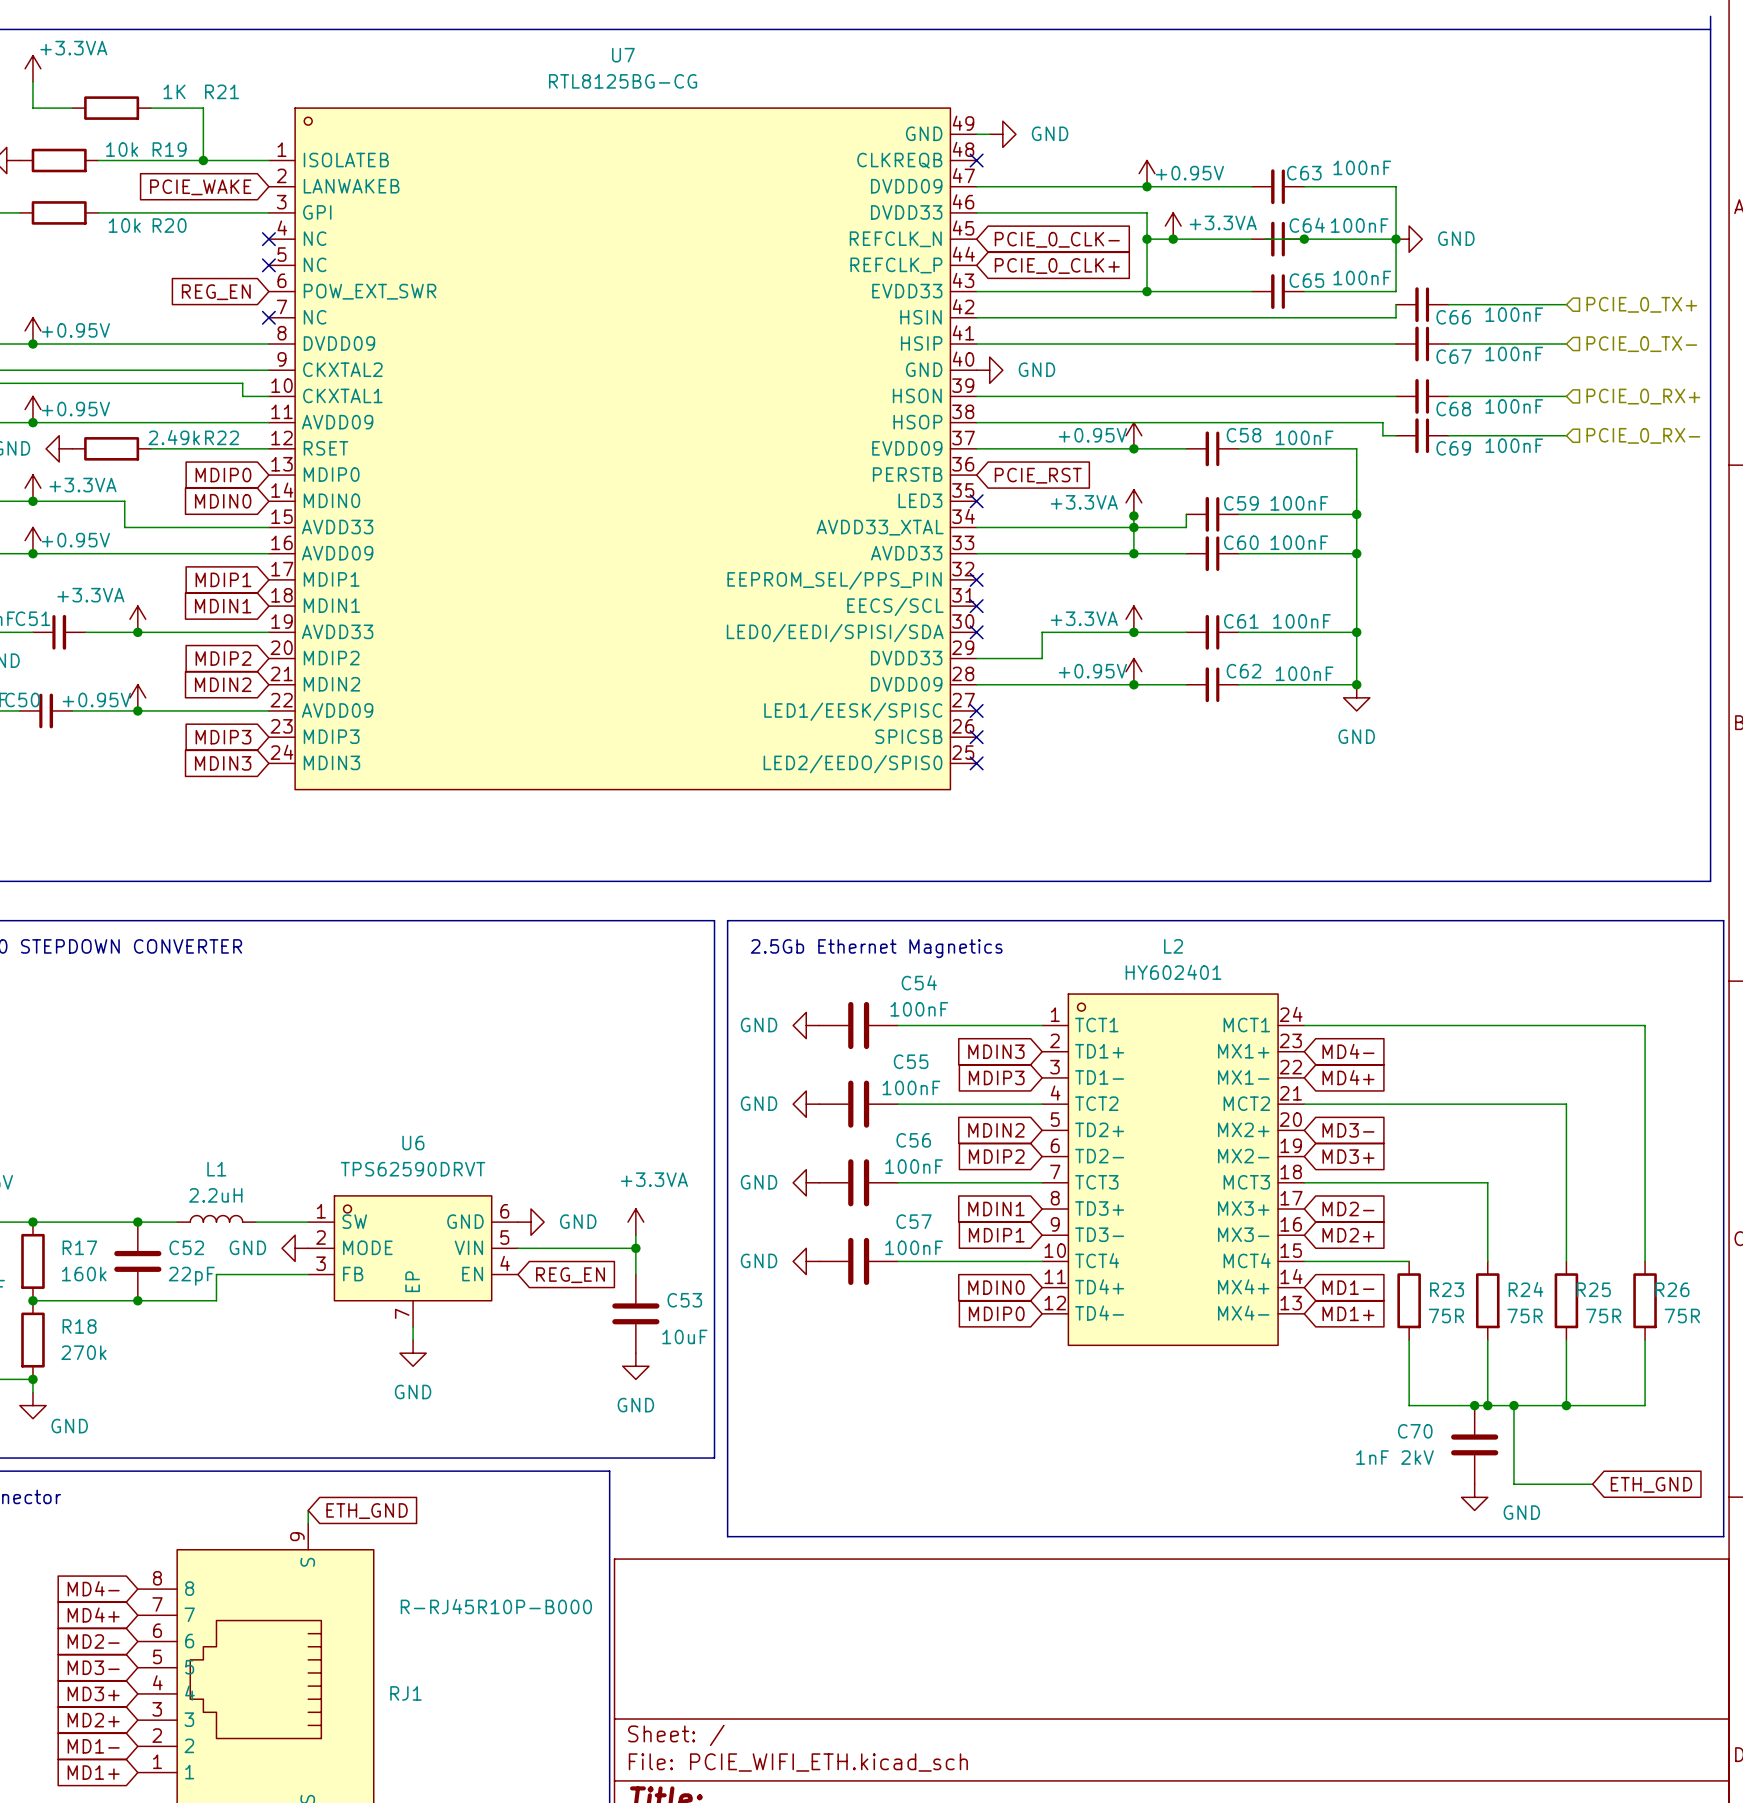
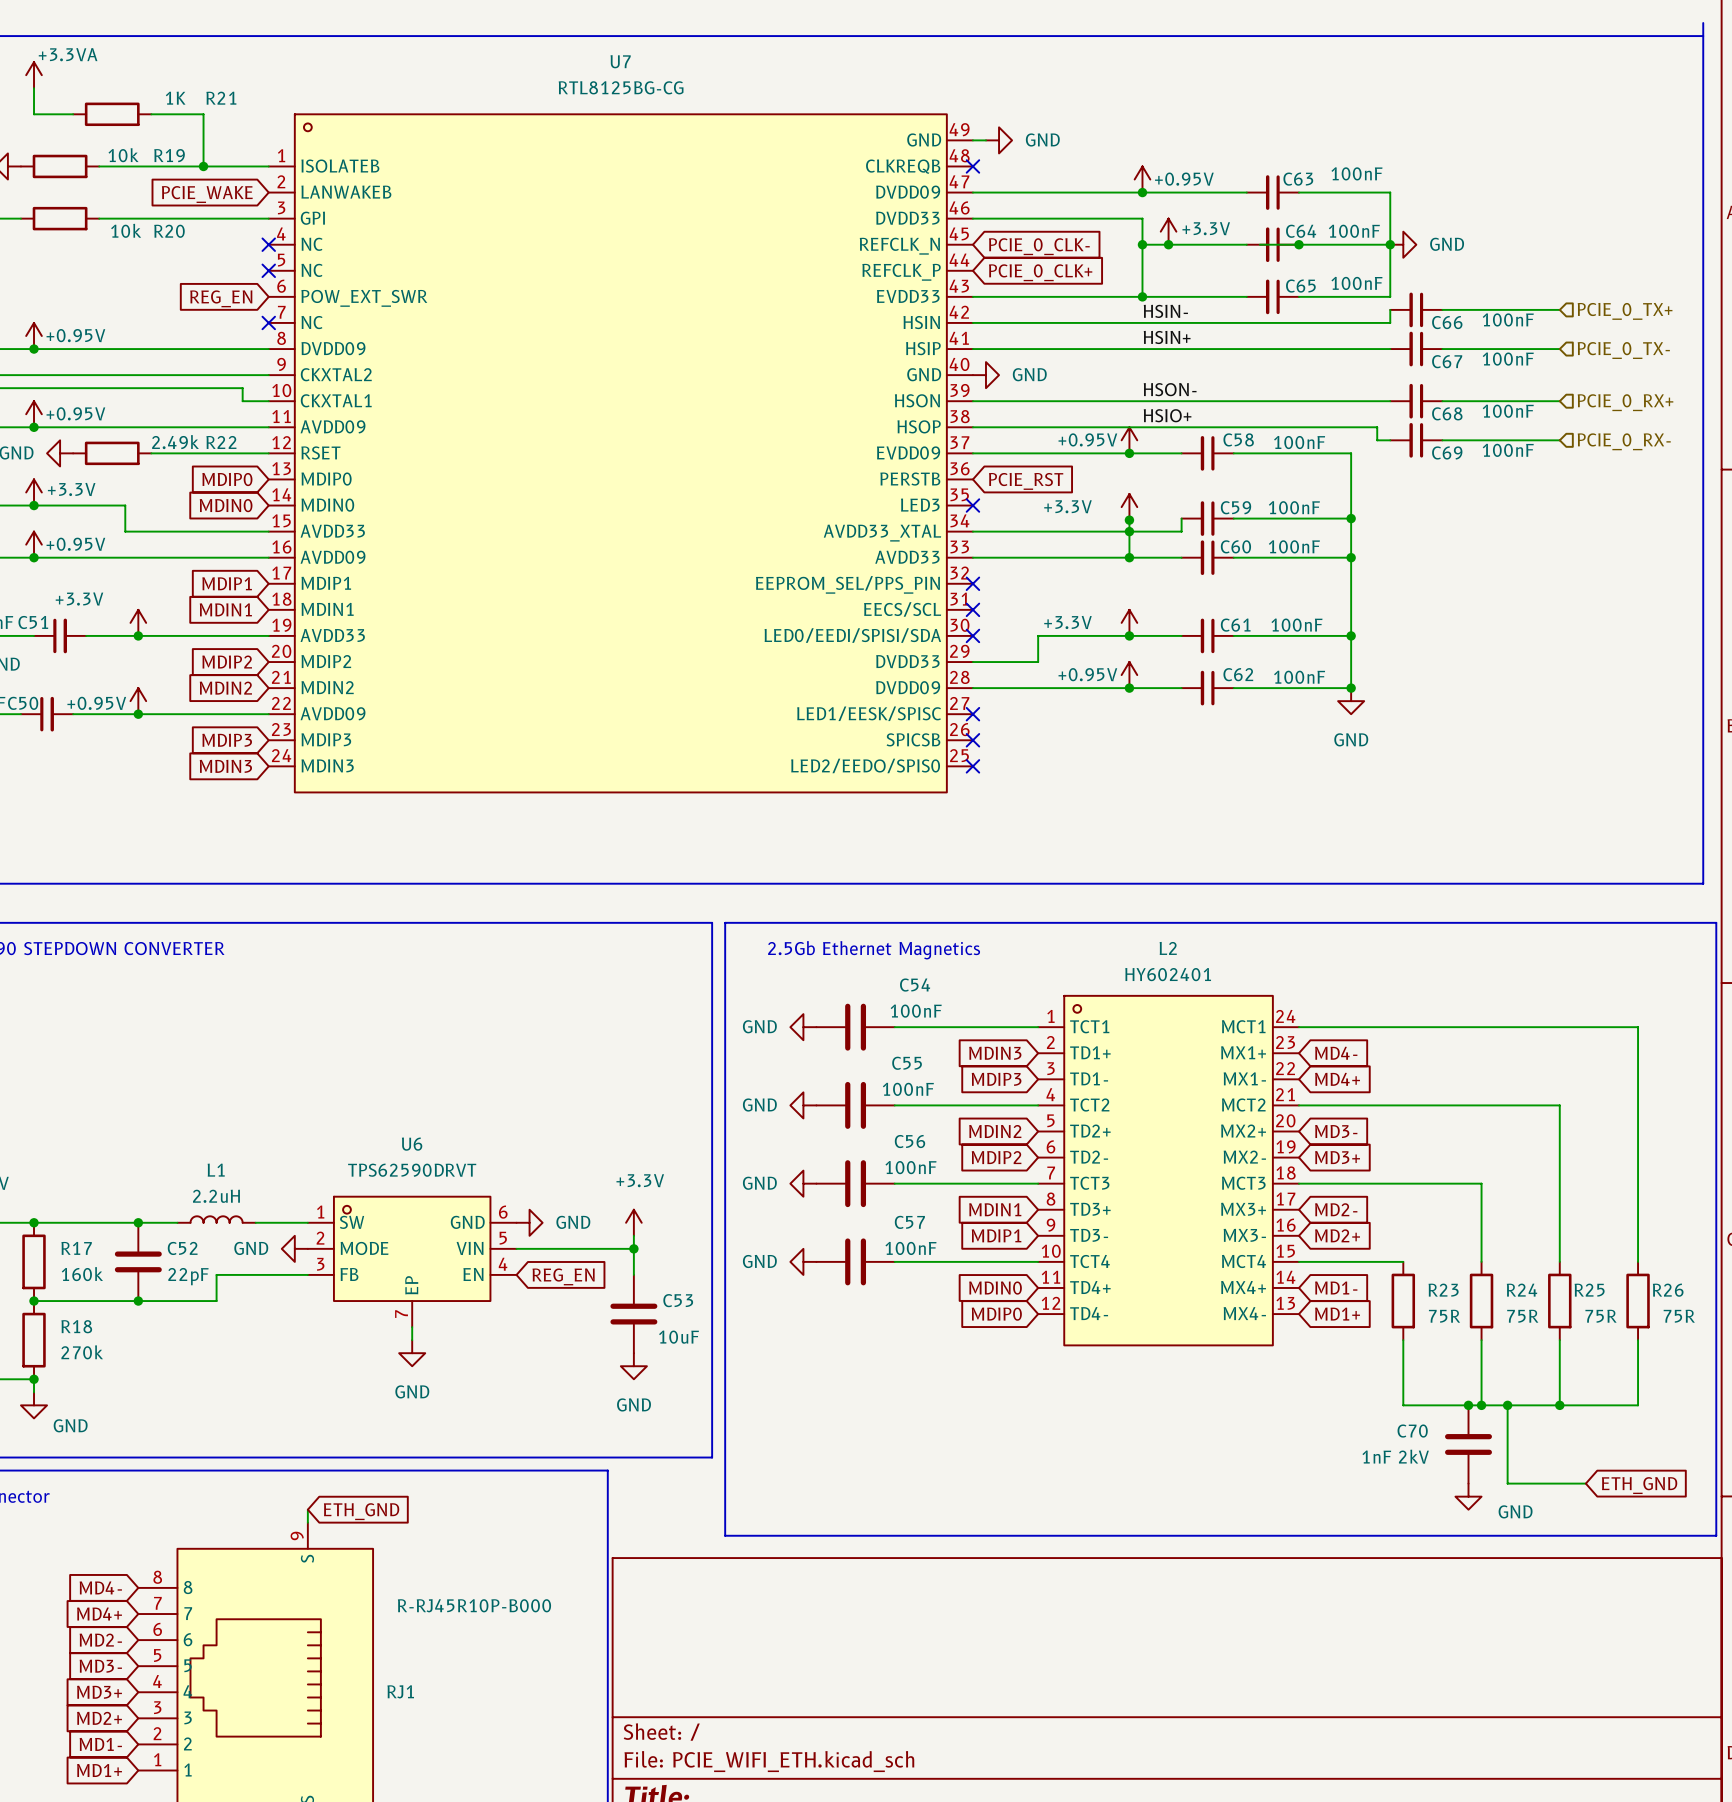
power symbol: +3.3VA (1173, 226) -> +3.3V (1168, 231)
label: none -> HSIN- (1165, 311)
label: none -> HSIN+ (1167, 337)
label: none -> HSON- (1170, 389)
label: none -> HSIO+ (1167, 415)
power symbol: +3.3VA (32, 488) -> +3.3V (34, 492)
power symbol: +3.3VA (1133, 502) -> +3.3V (1129, 507)
power symbol: +3.3VA (137, 619) -> +3.3V (138, 622)
power symbol: +3.3VA (1133, 619) -> +3.3V (1129, 622)
power symbol: +3.3VA (635, 1222) -> +3.3V (633, 1222)

